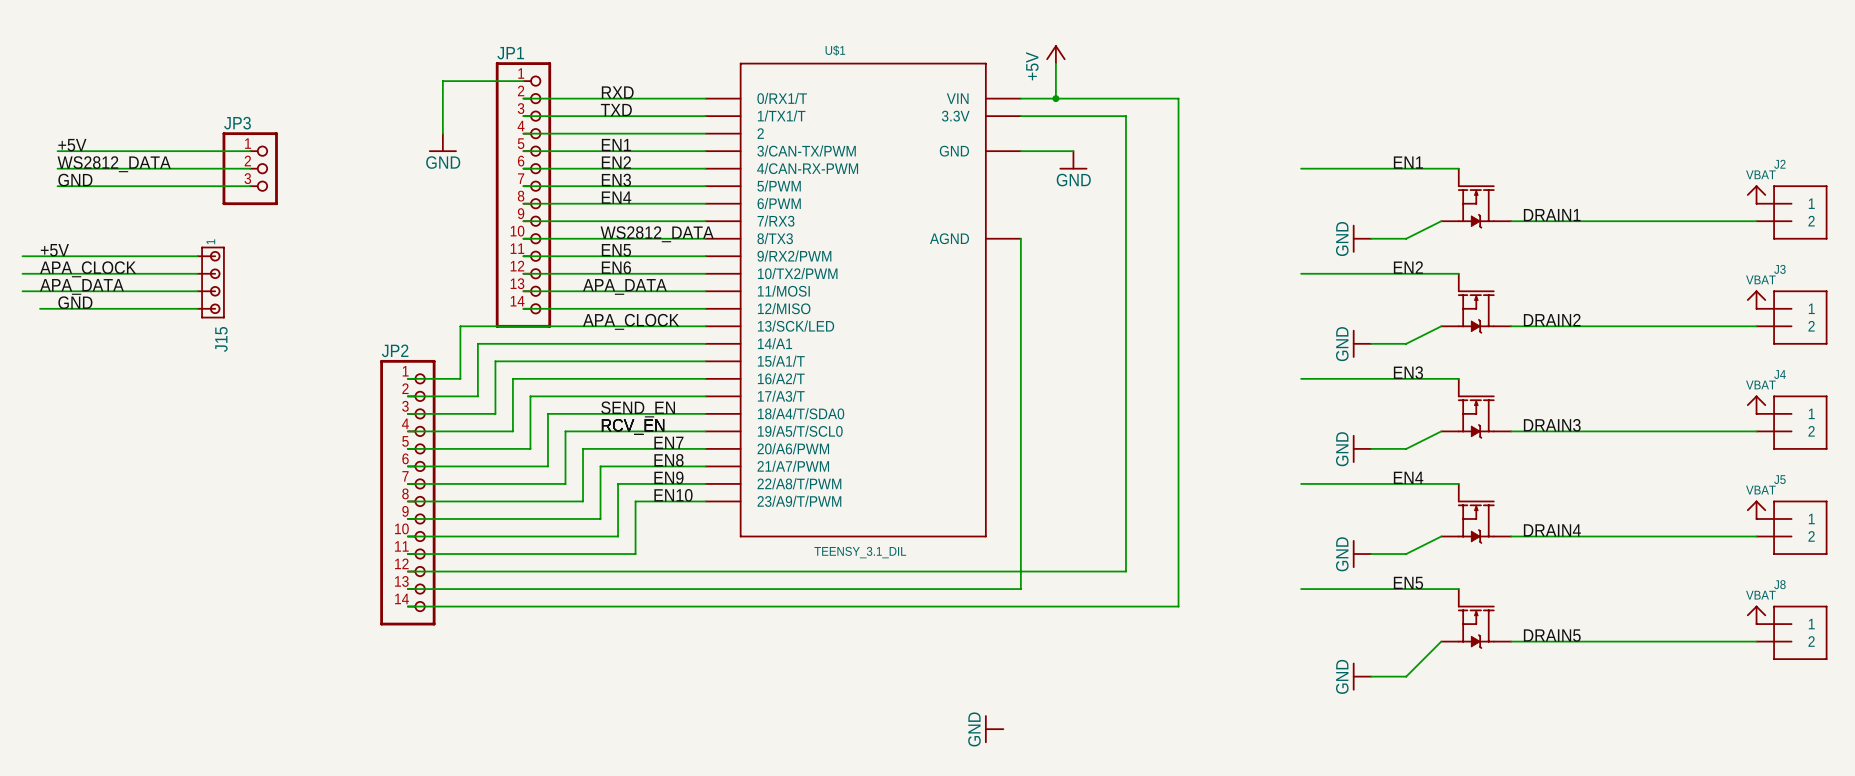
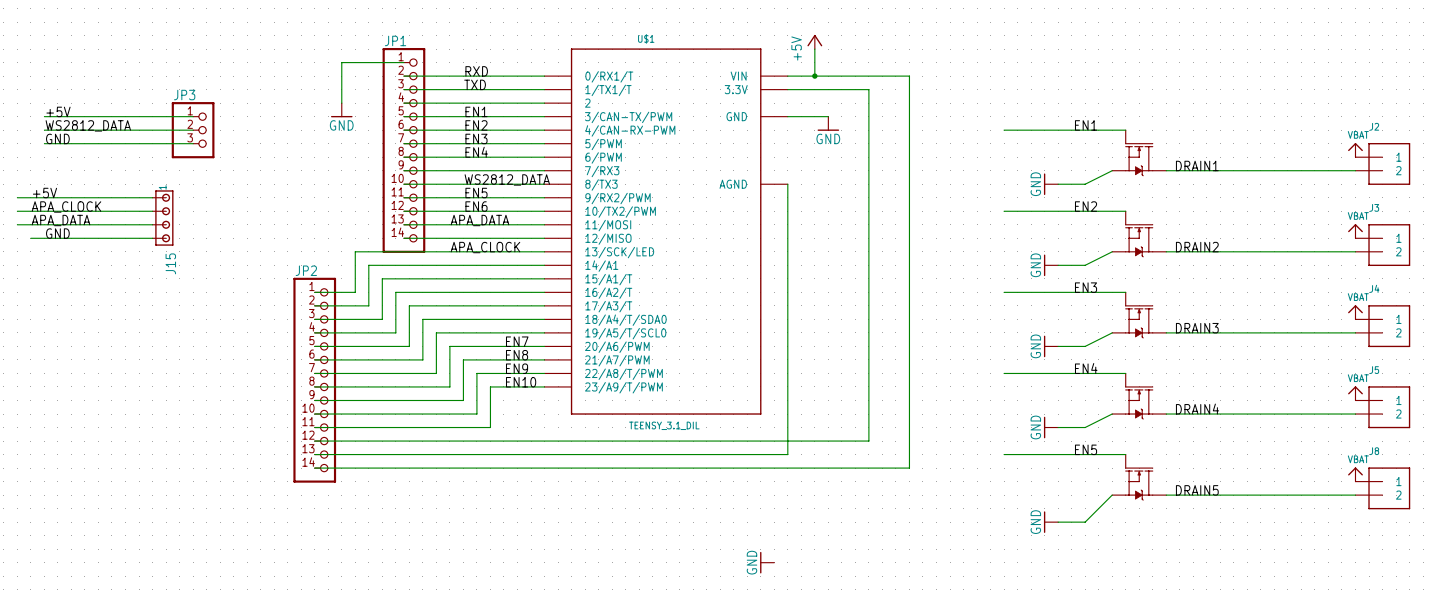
label: SEND_EN (638, 409) -> none
label: RCV_EN (633, 426) -> none

